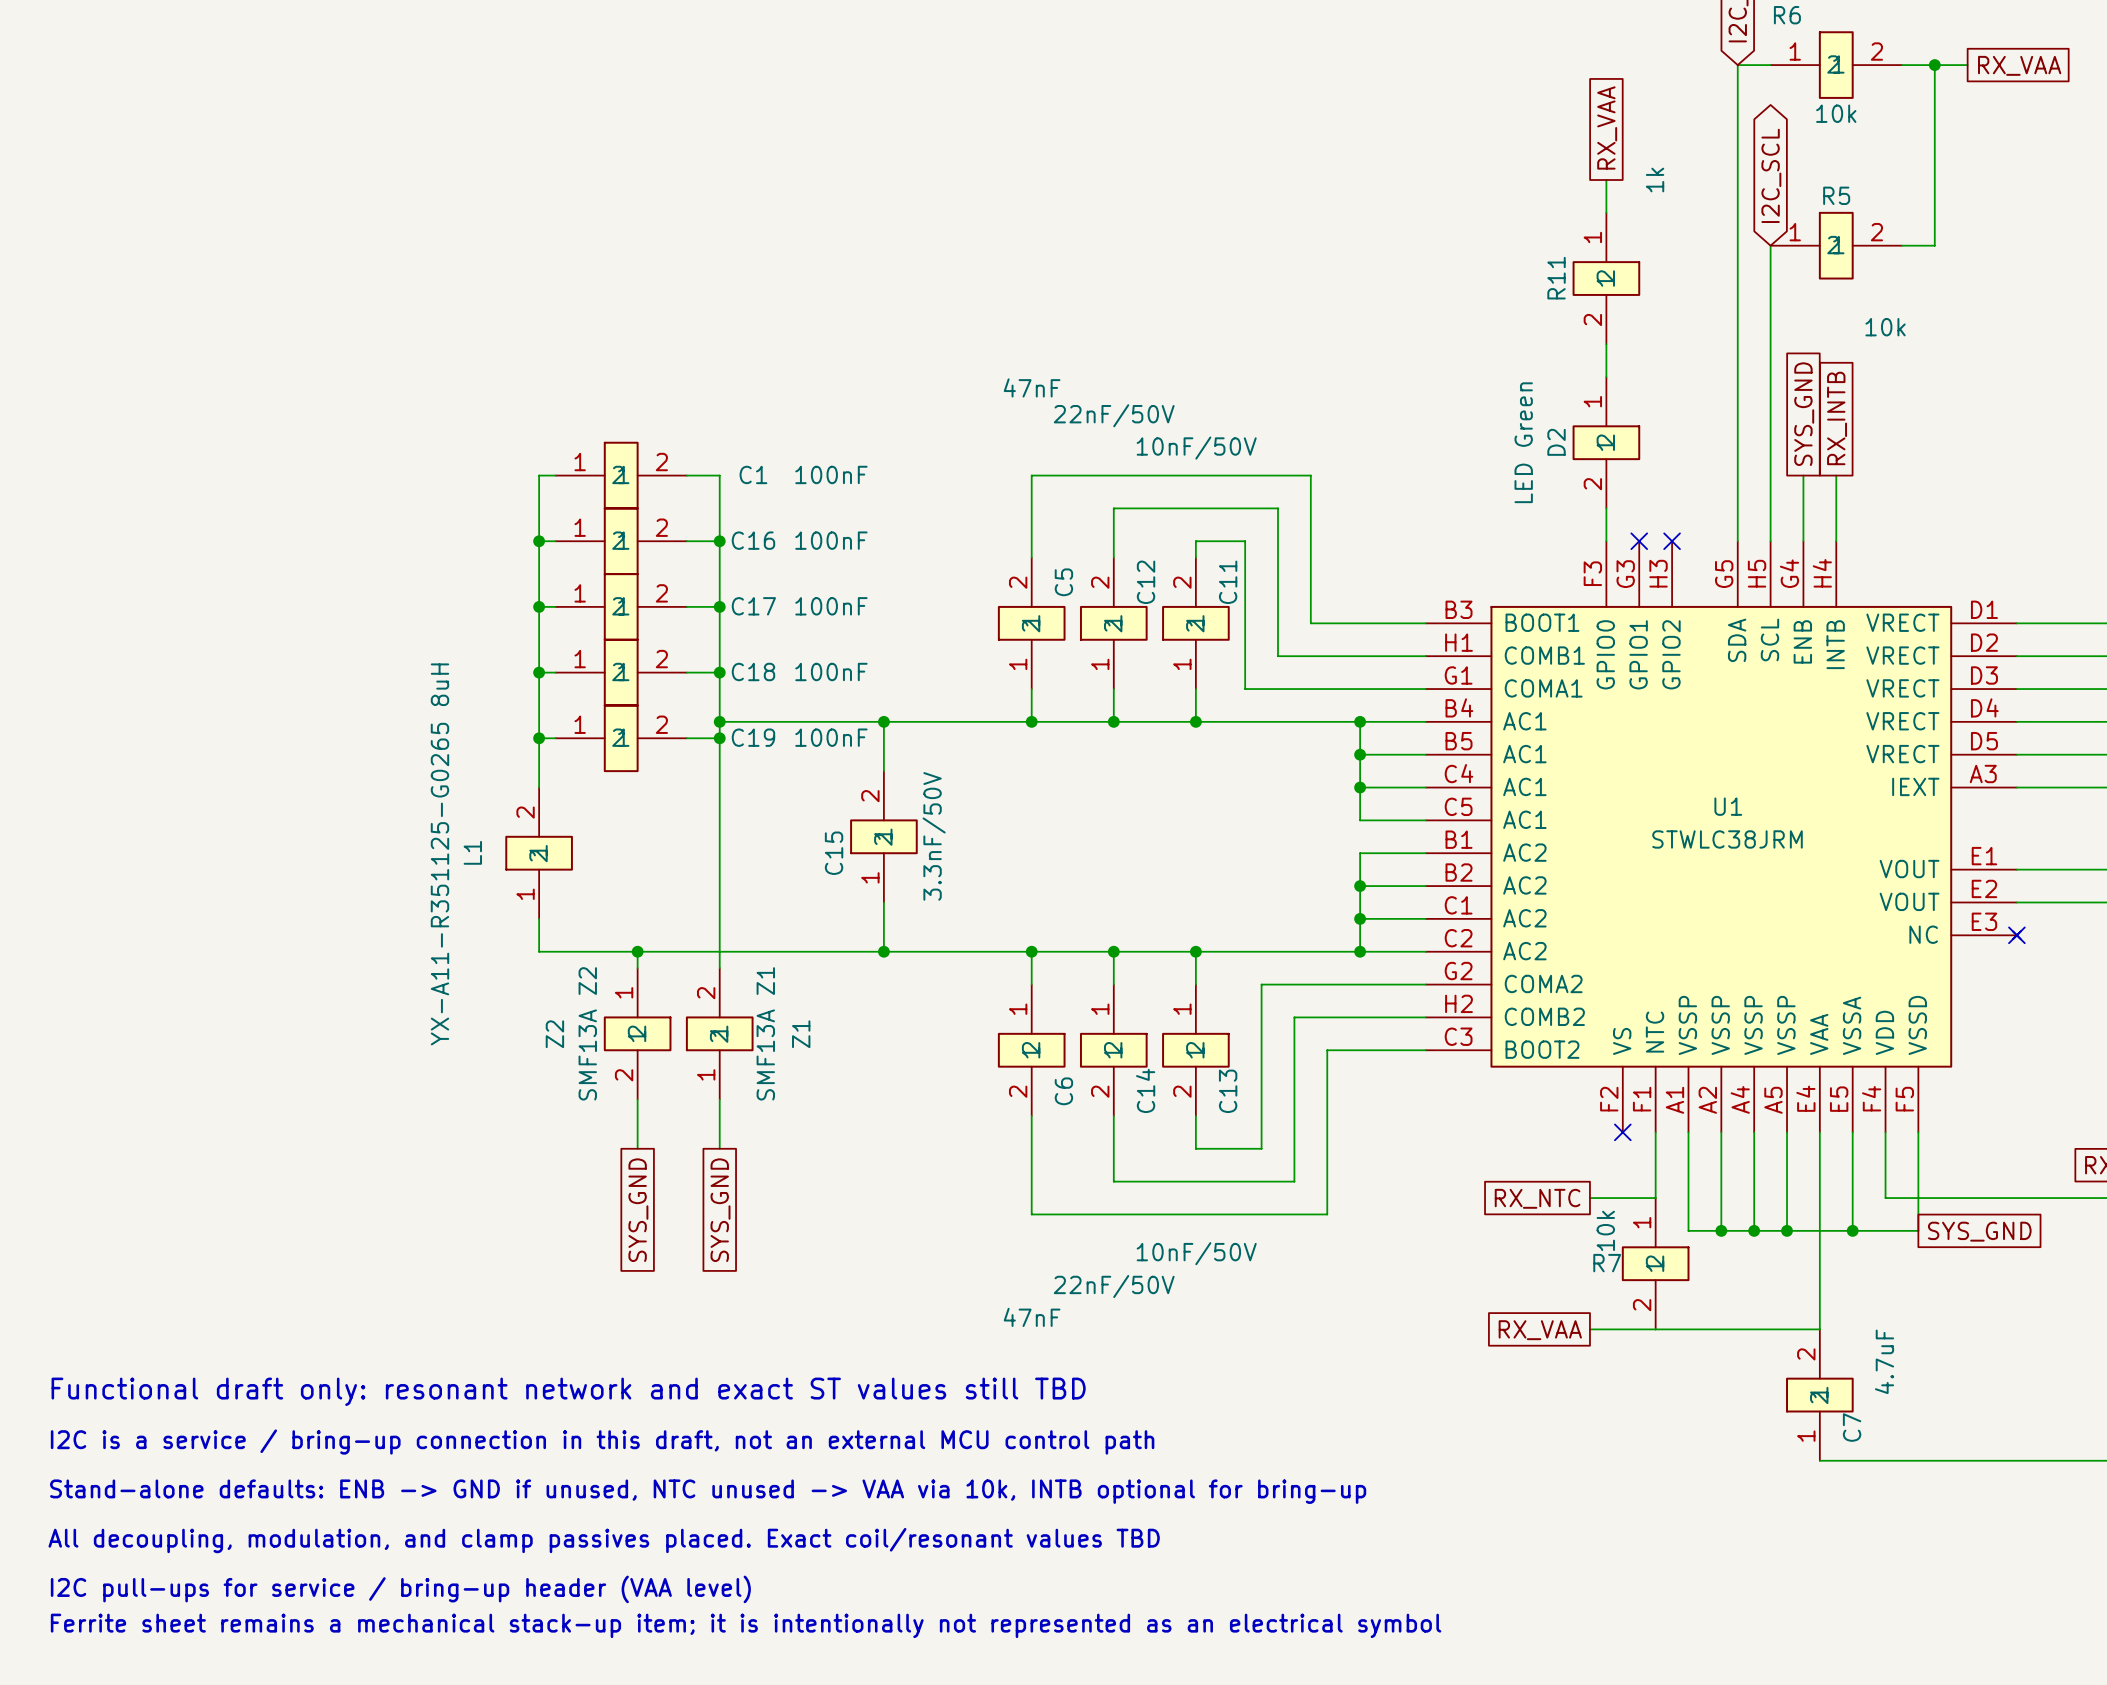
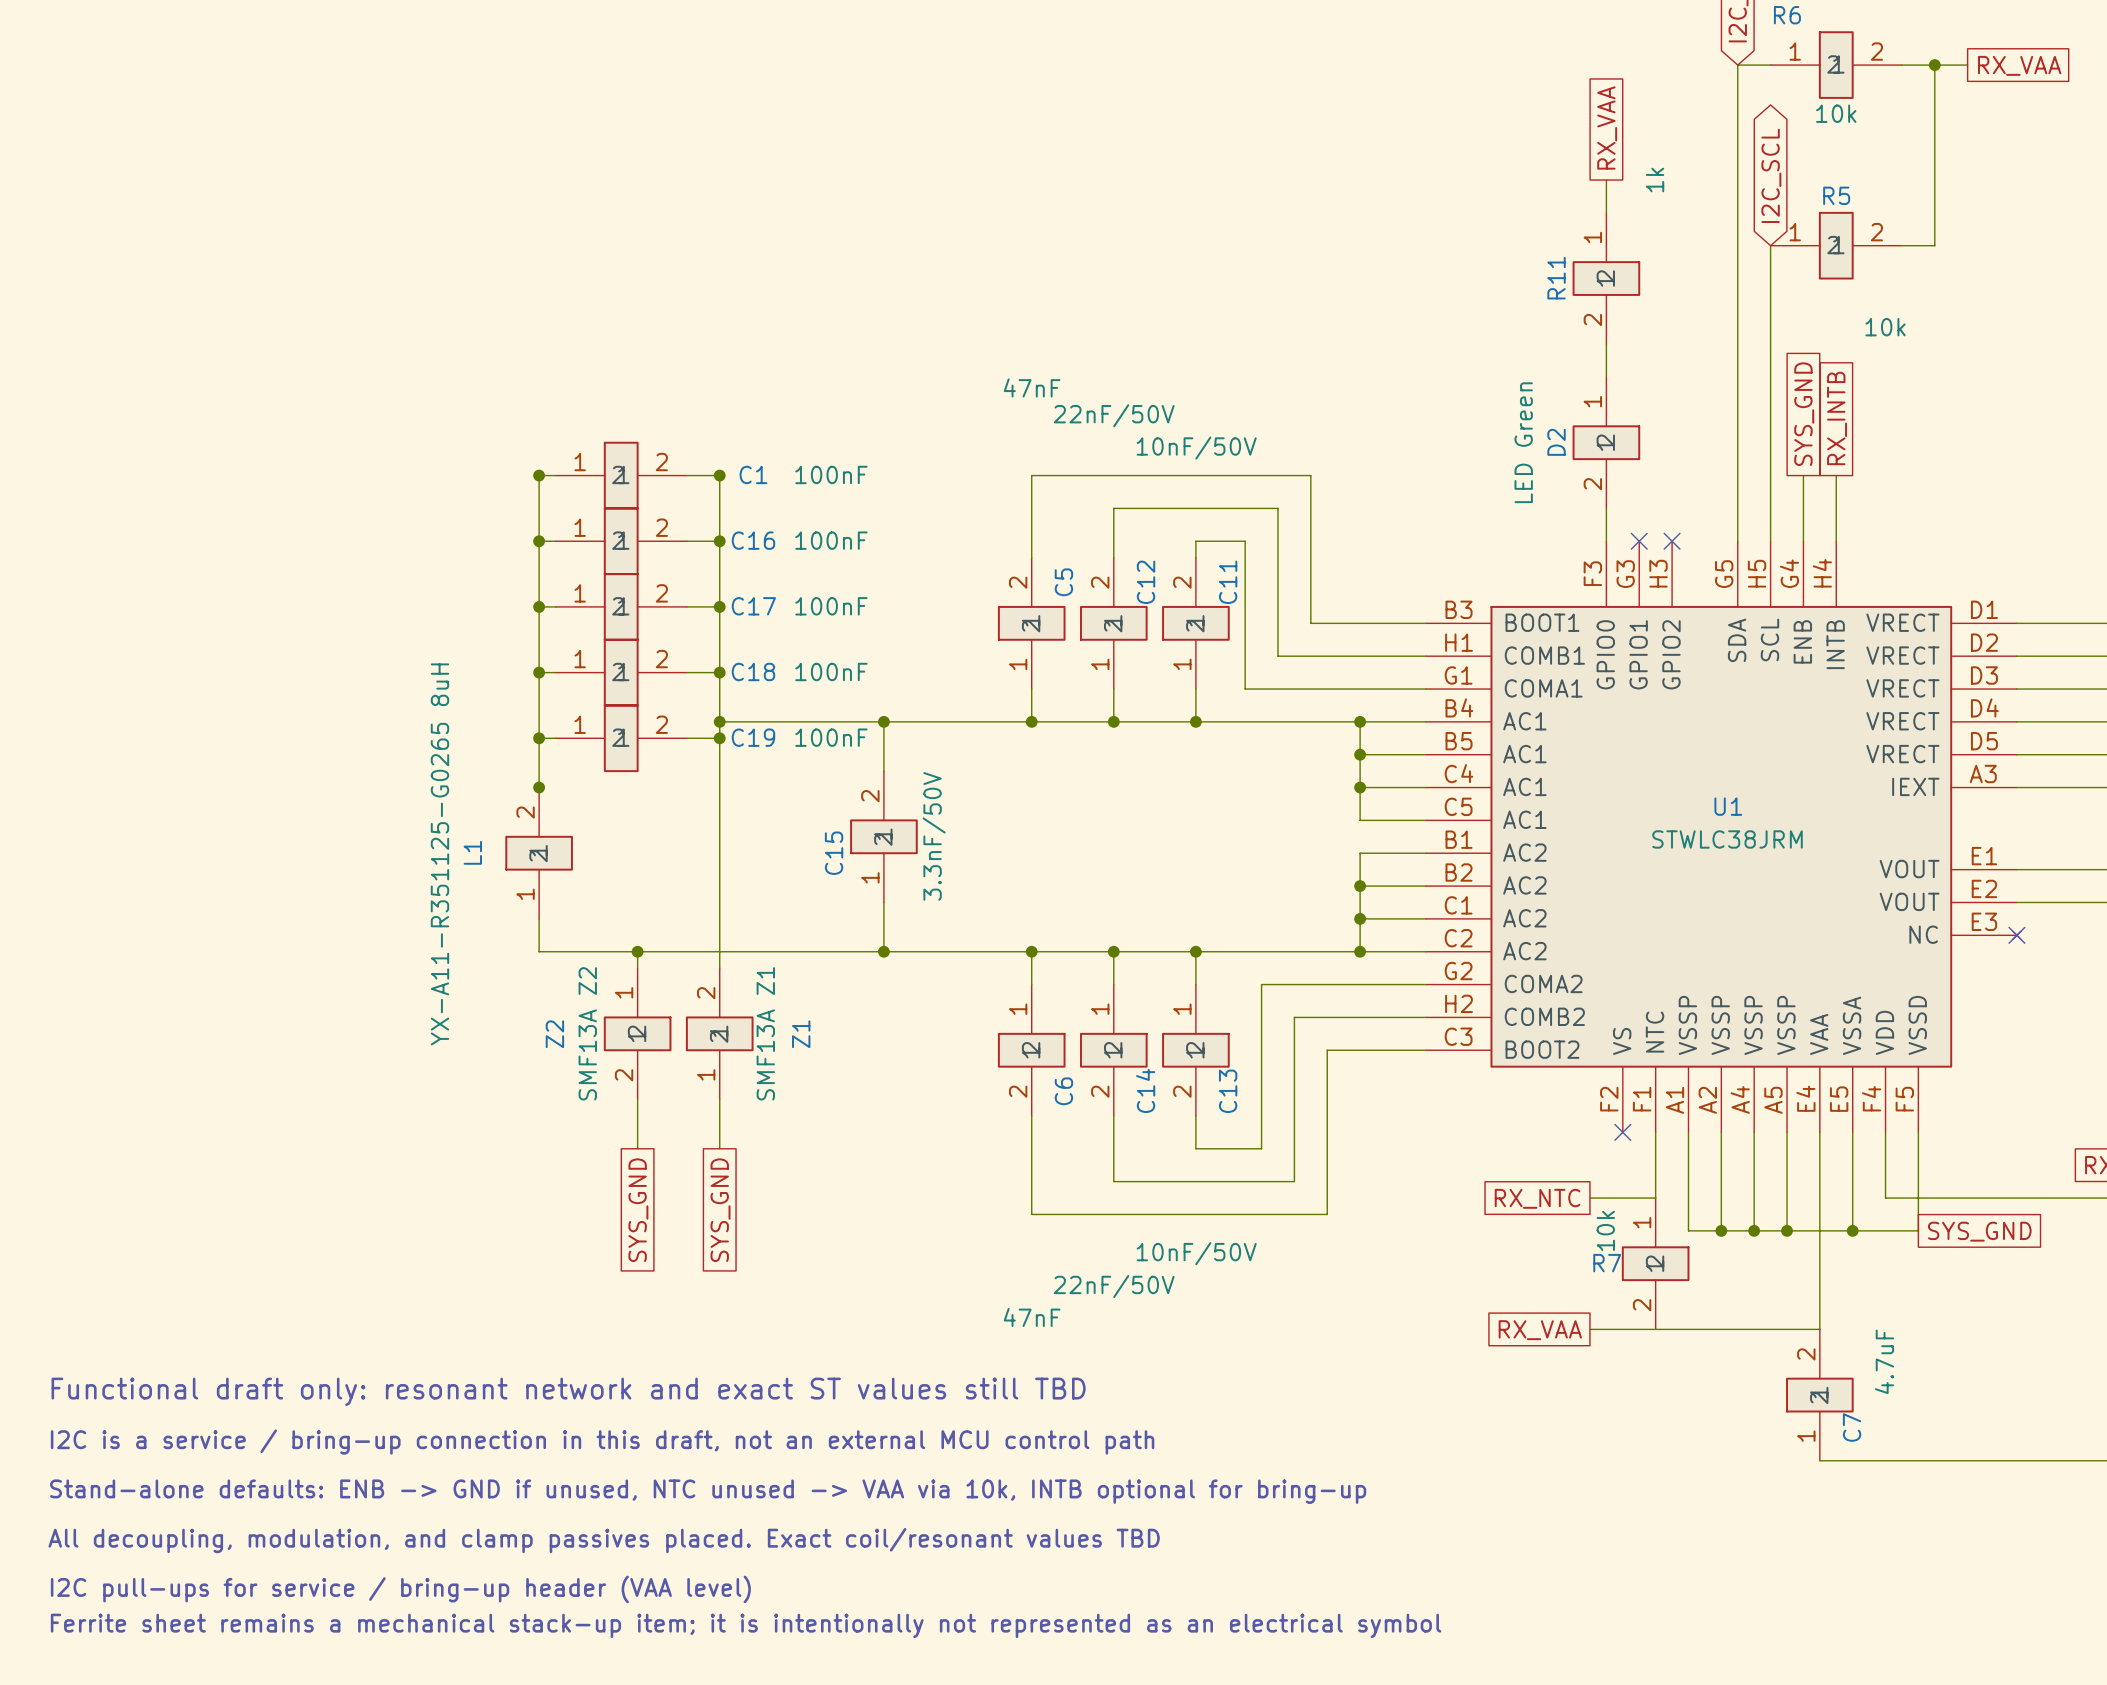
junction: none -> (539, 475)
junction: none -> (719, 475)
junction: none -> (539, 787)

